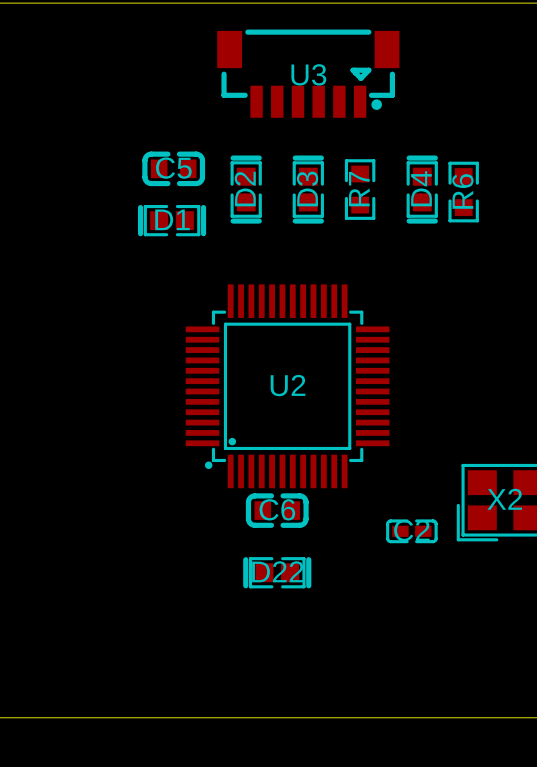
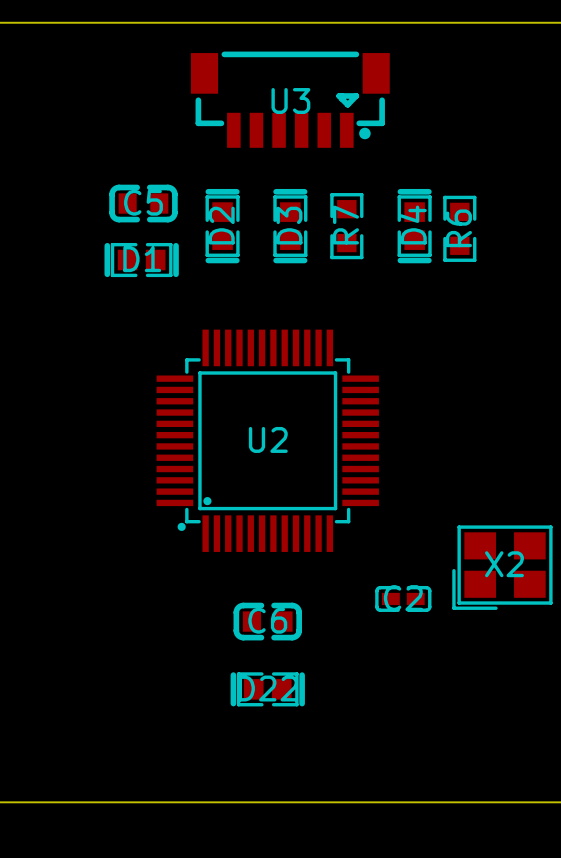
C6 position: (277, 510) -> (267, 621)
D22 position: (277, 572) -> (267, 689)

